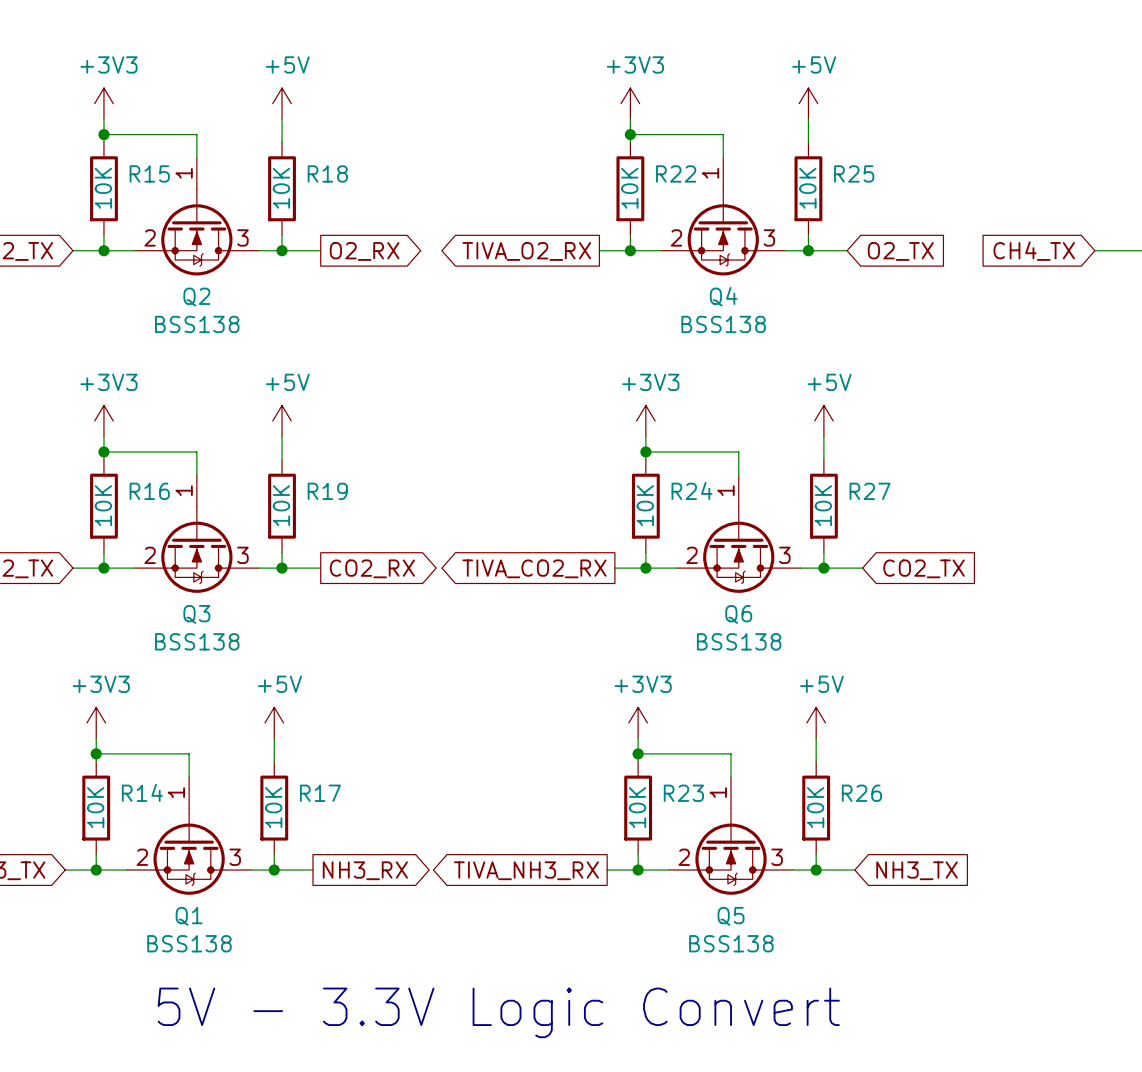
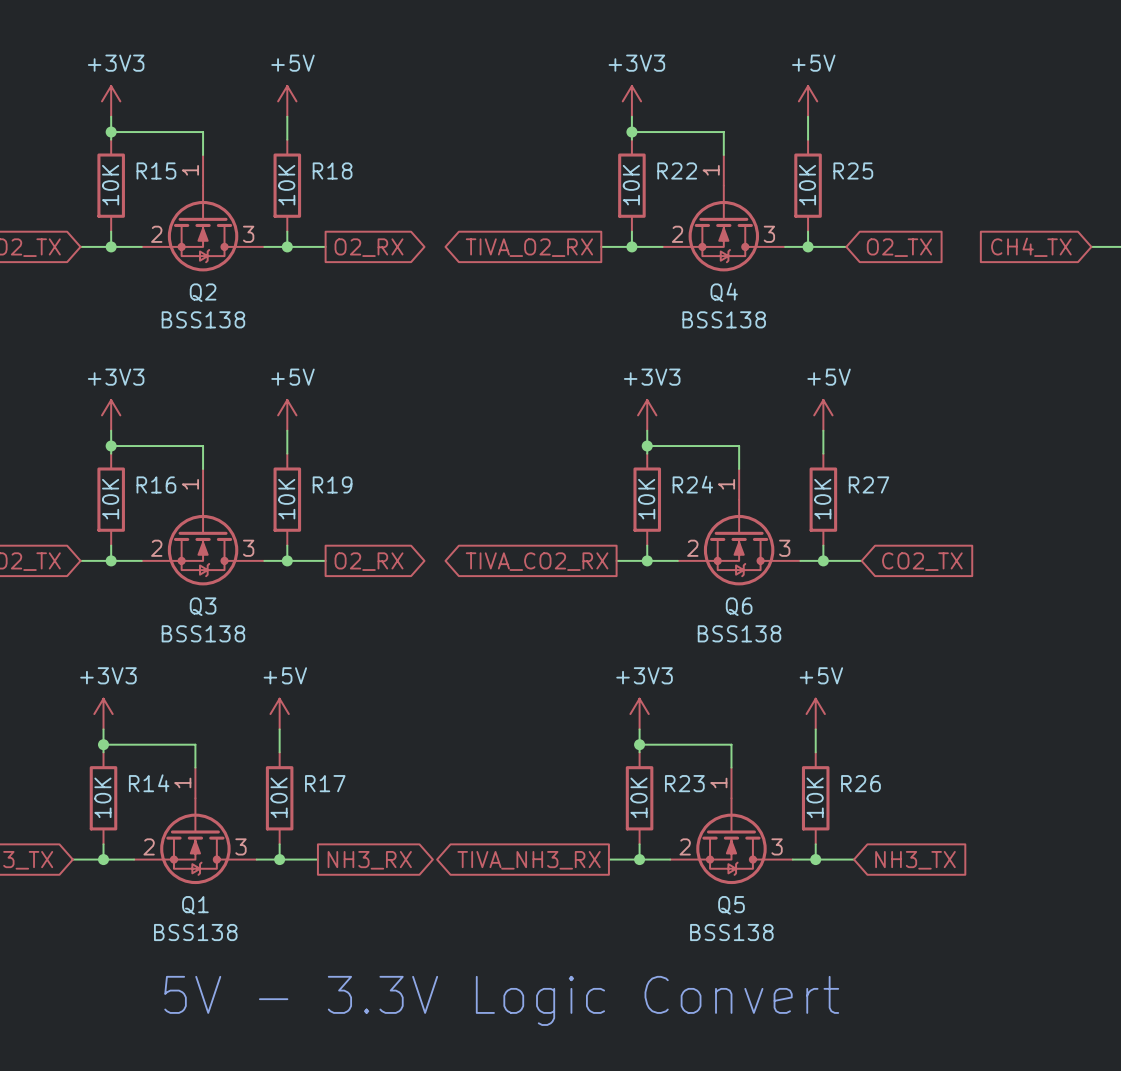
global label: CO2_RX (372, 568) -> O2_RX (369, 561)

